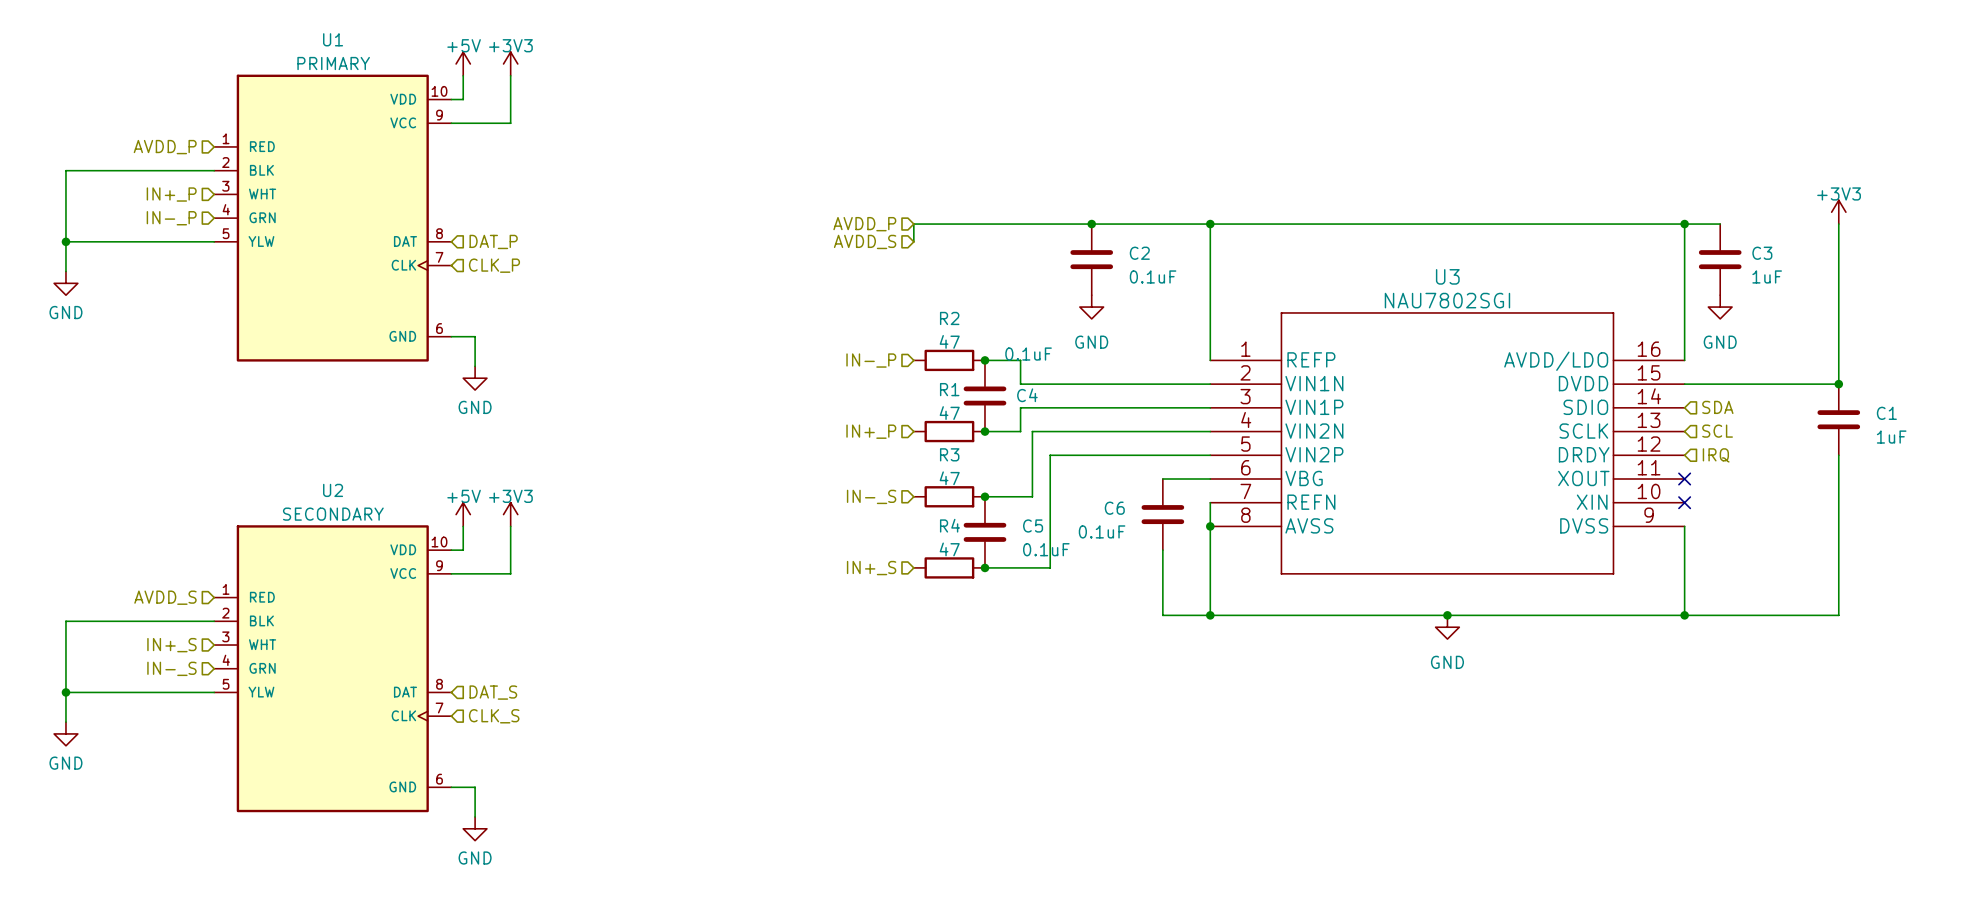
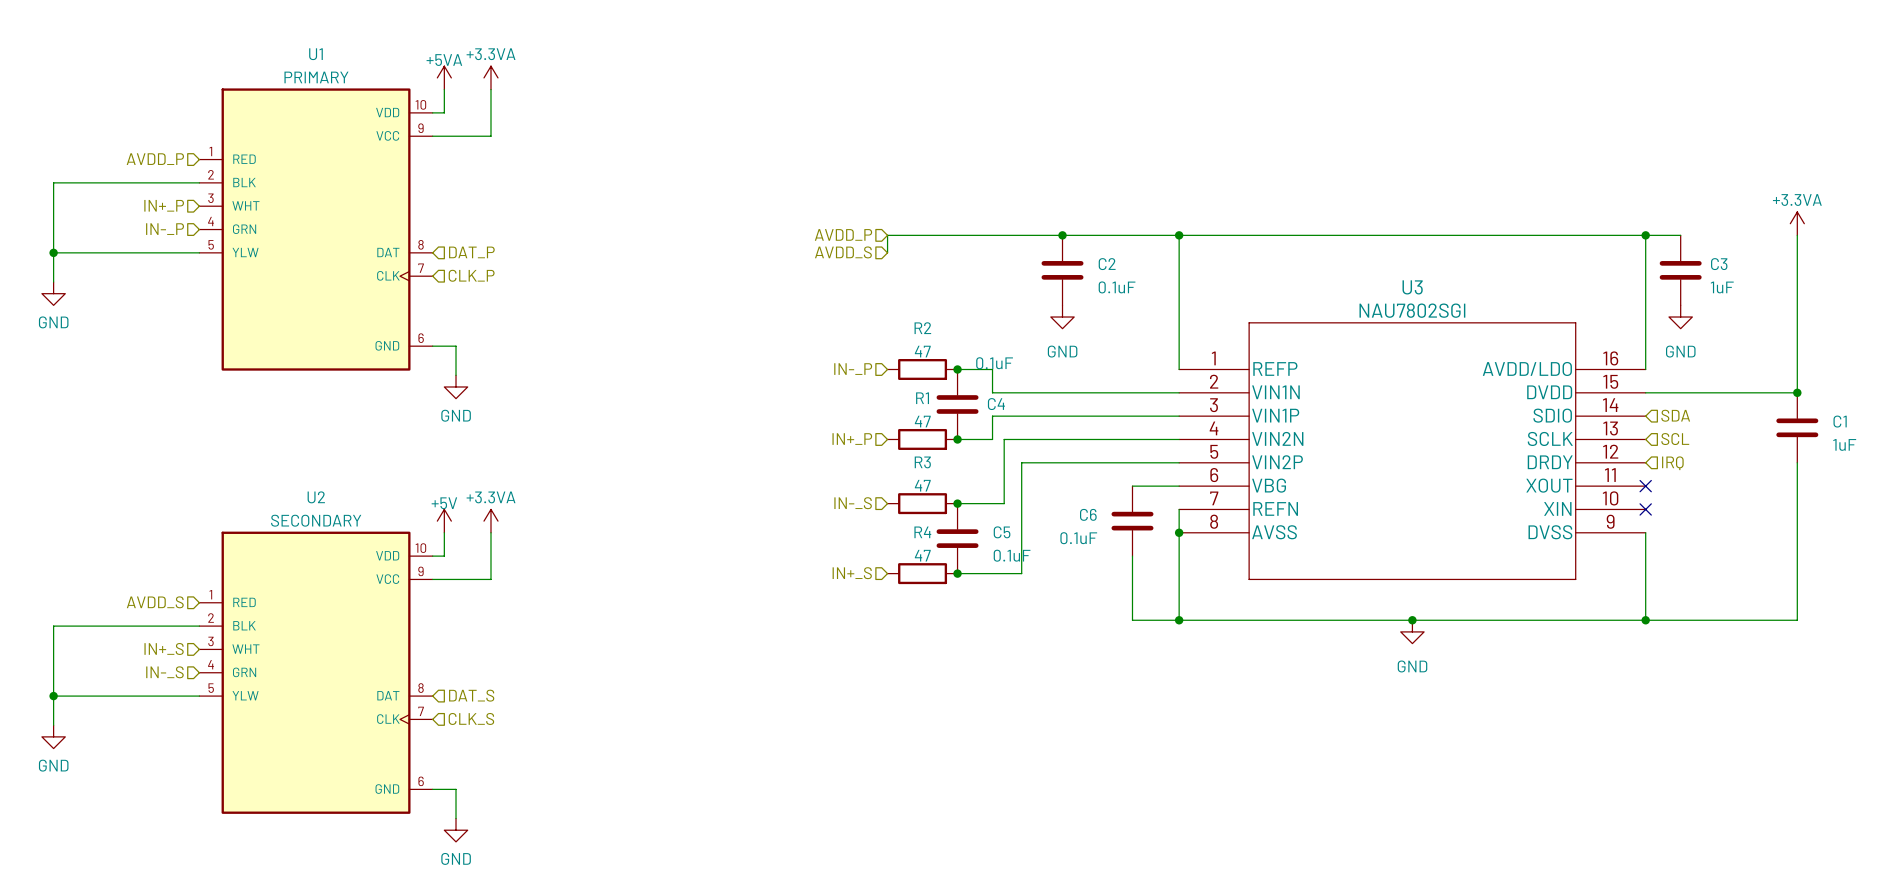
power symbol: +5V (463, 63) -> +5VA (444, 77)
power symbol: +3V3 (510, 63) -> +3.3VA (490, 77)
power symbol: +3V3 (1838, 212) -> +3.3VA (1797, 223)
power symbol: +3V3 (510, 514) -> +3.3VA (490, 521)

